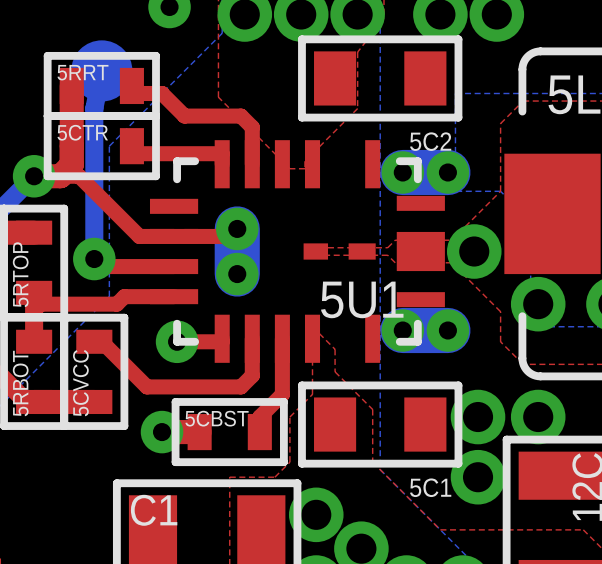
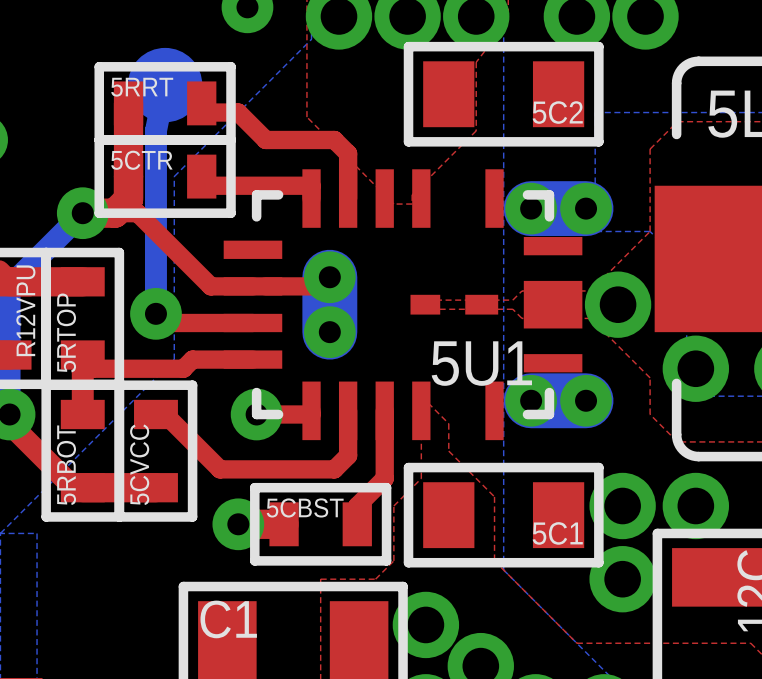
5C2 name position: 5C2 (430, 141) -> 5C2 (557, 112)
5C1 name position: 5C1 (430, 487) -> 5C1 (557, 533)

